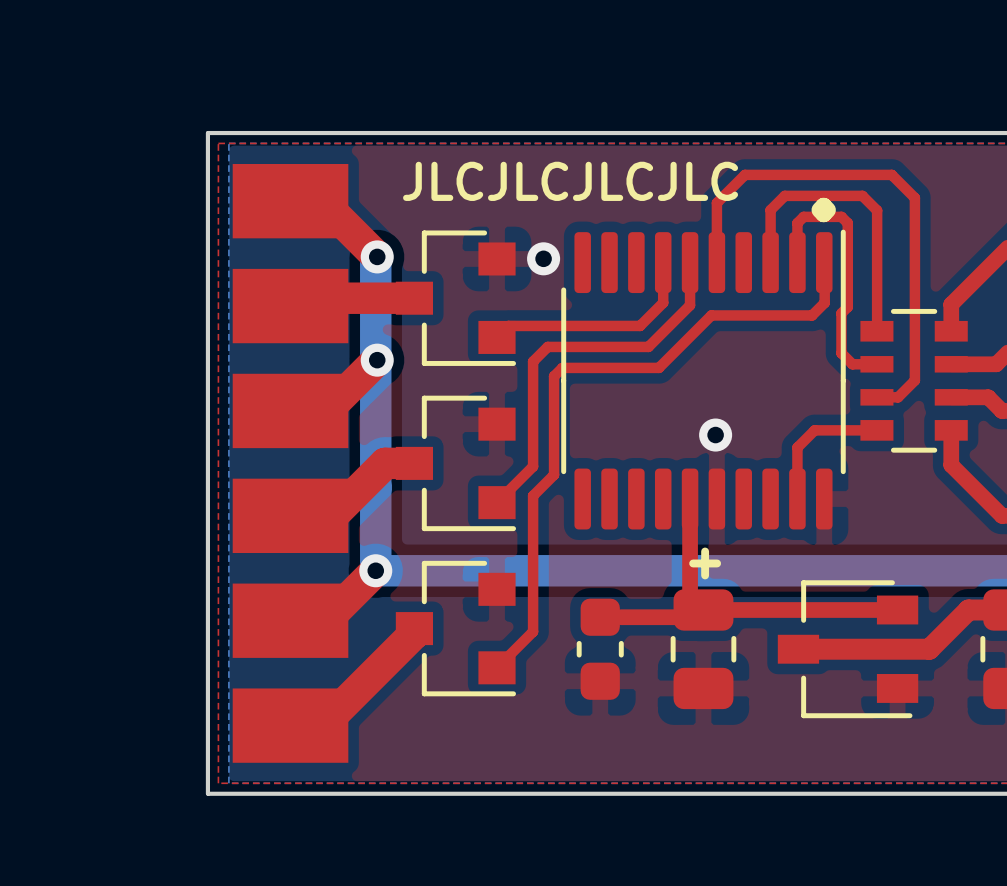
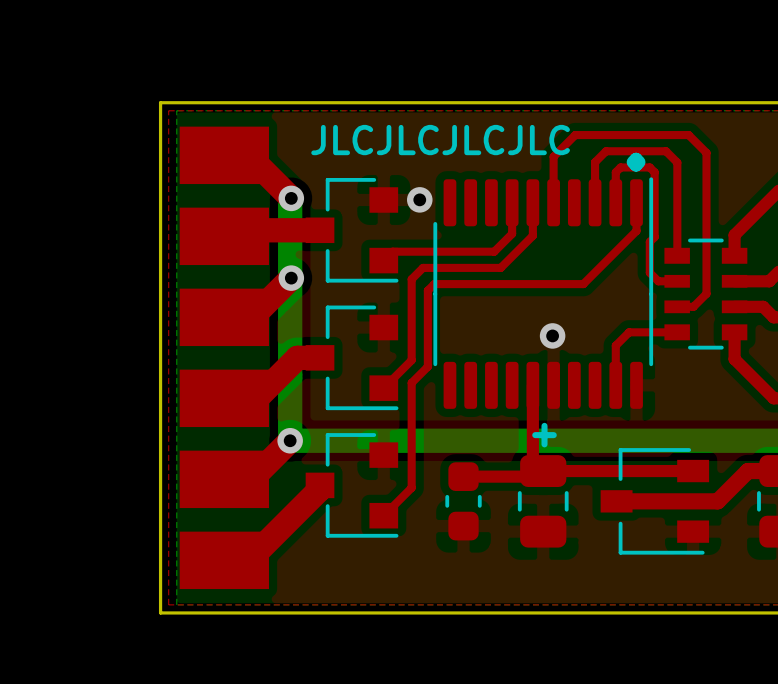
top track: (824, 263) (824, 302) (812, 315) (711, 315) (658, 367) -> (636, 202) (636, 230) (583, 284) (508, 284)

